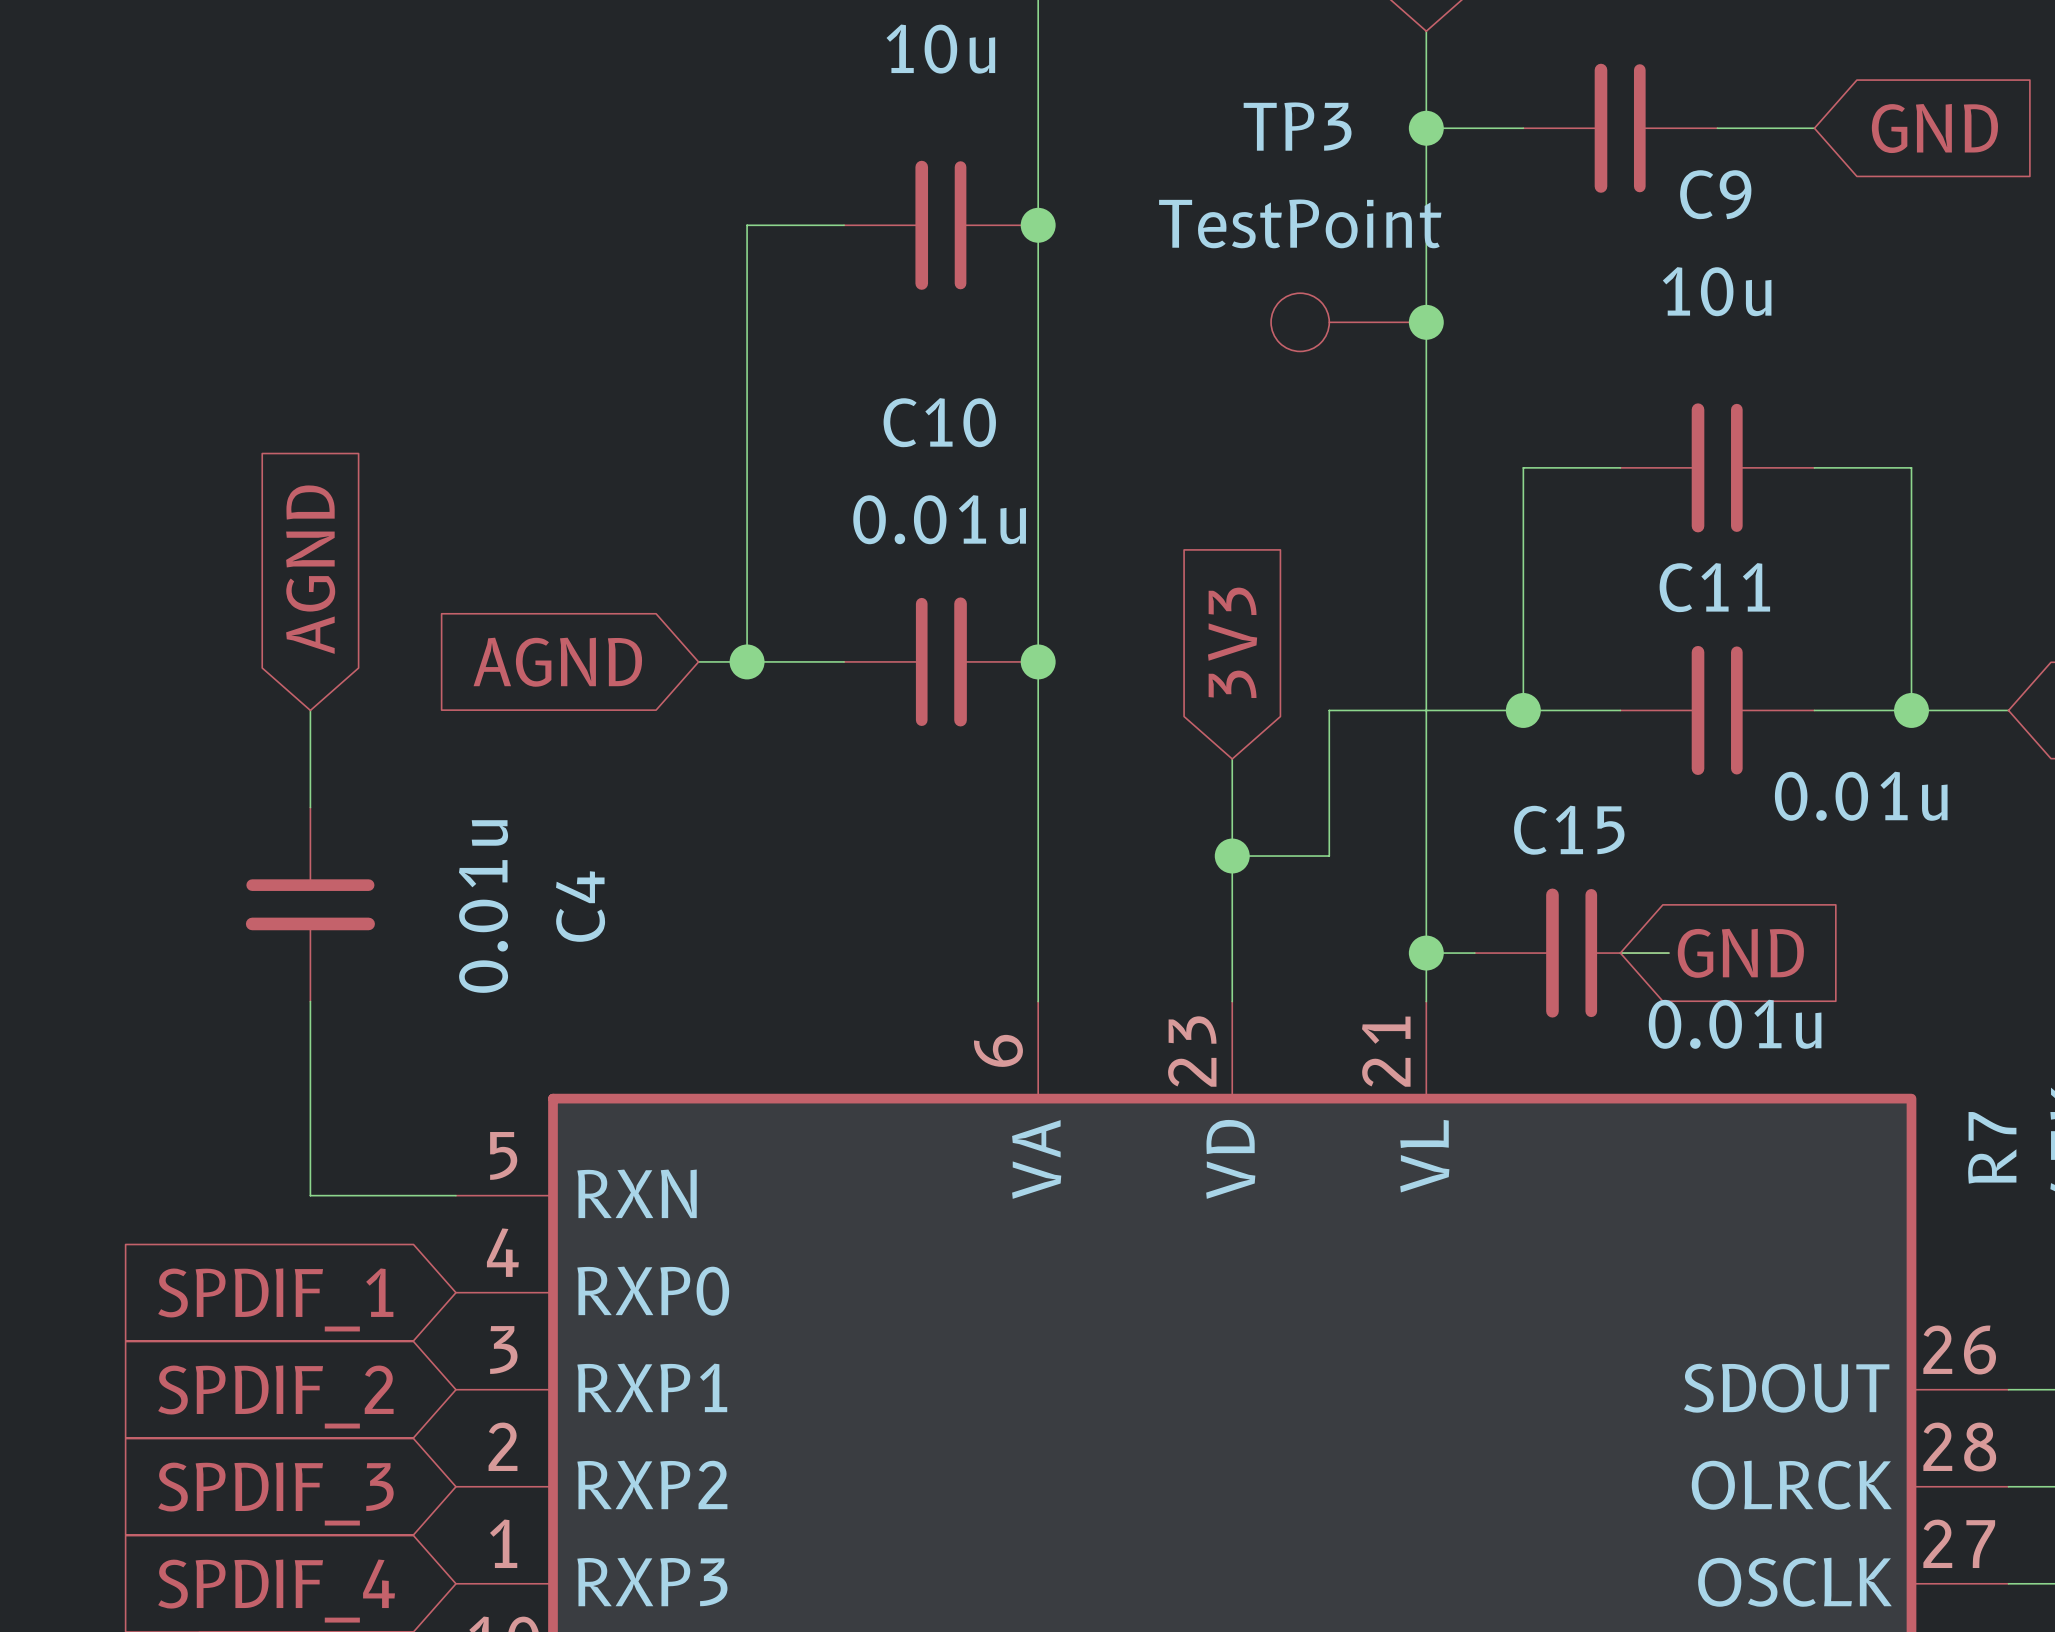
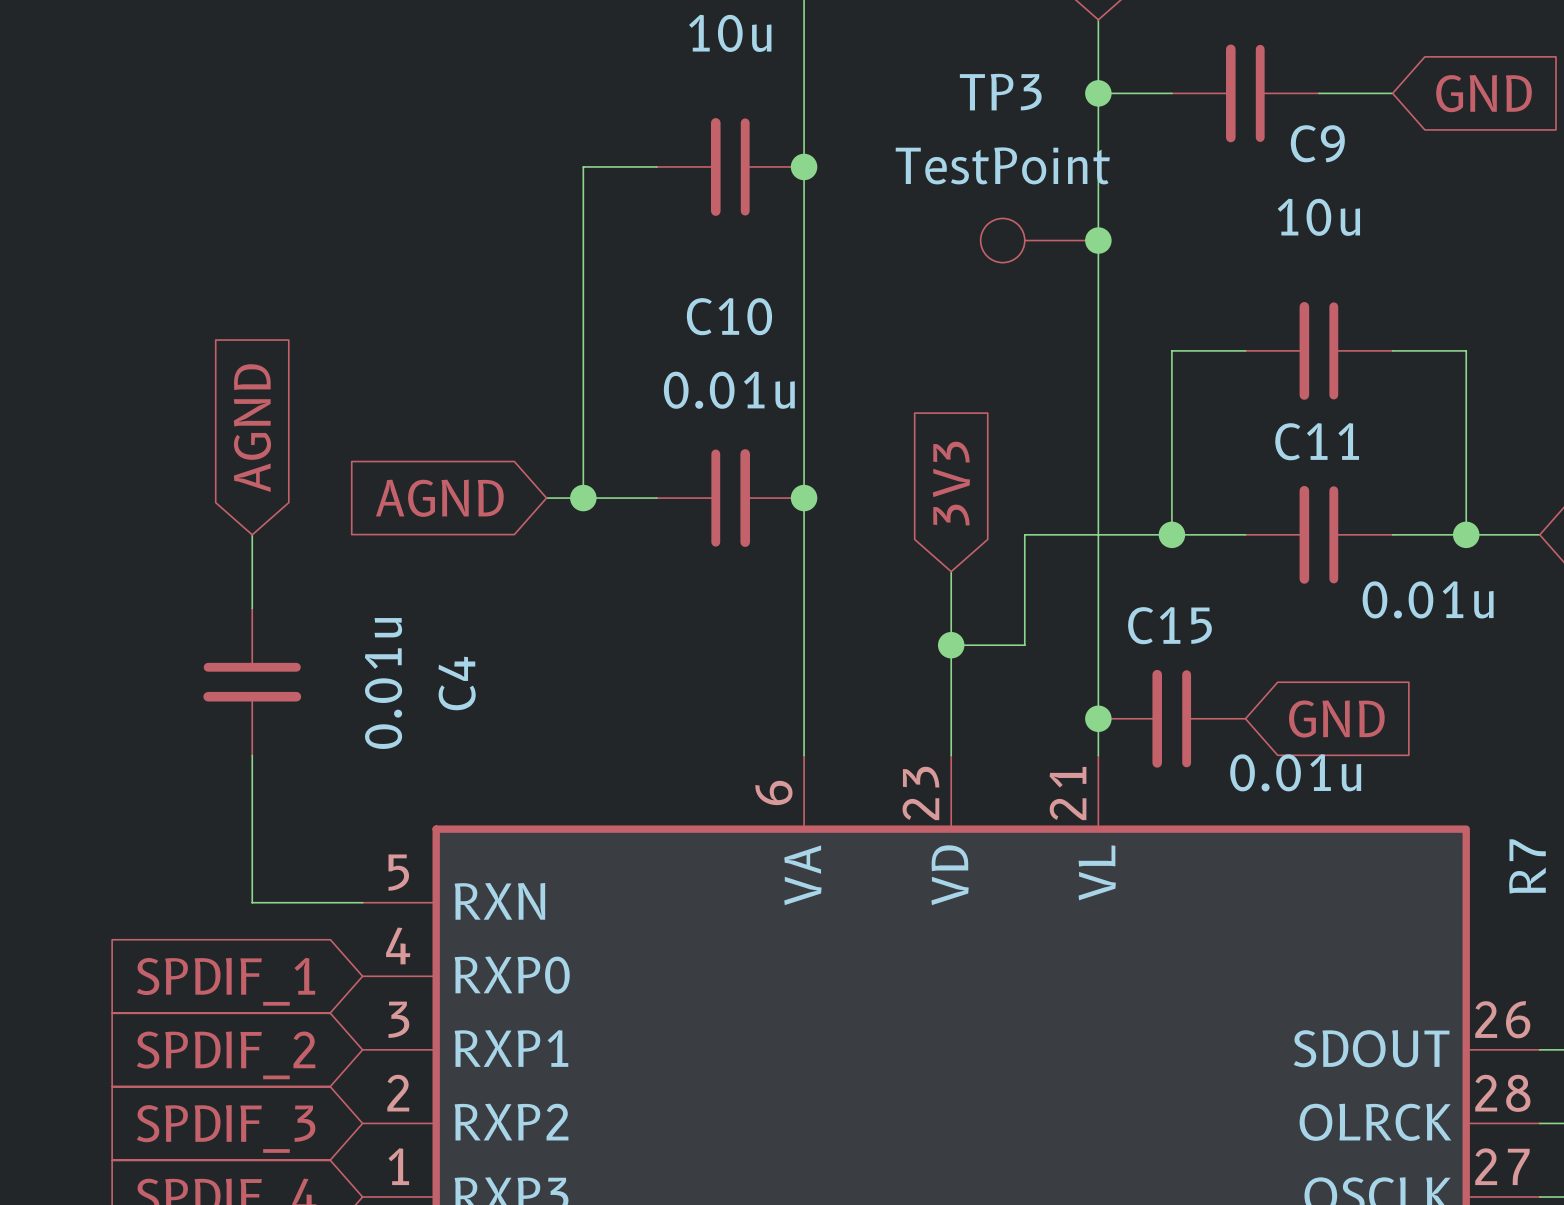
C15 position: (1571, 953) -> (1171, 718)
wire: (1620, 953) (1668, 953) -> none

